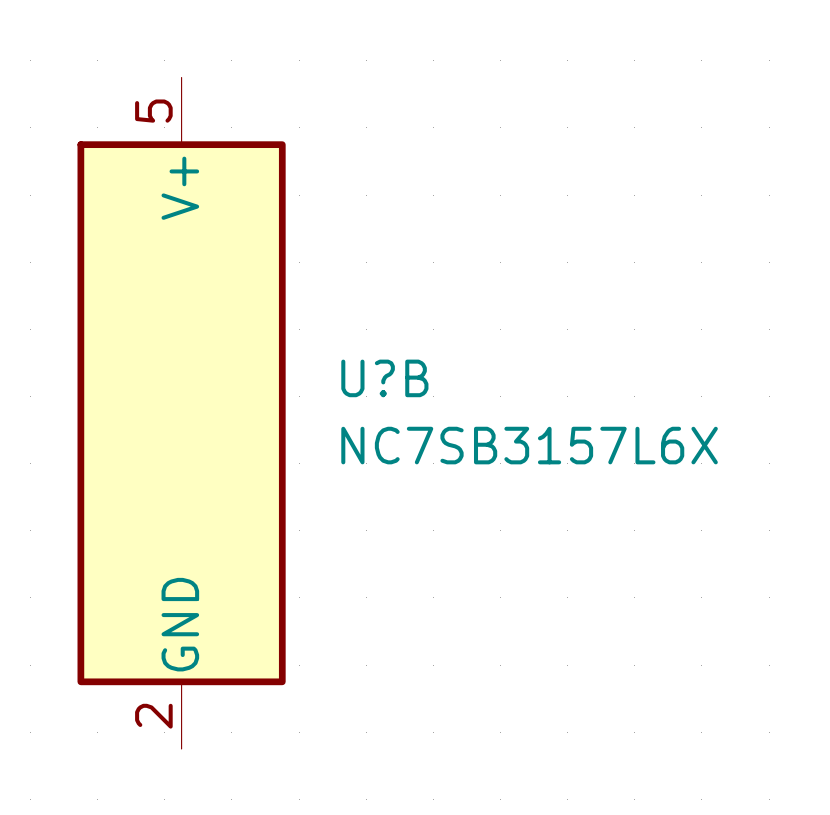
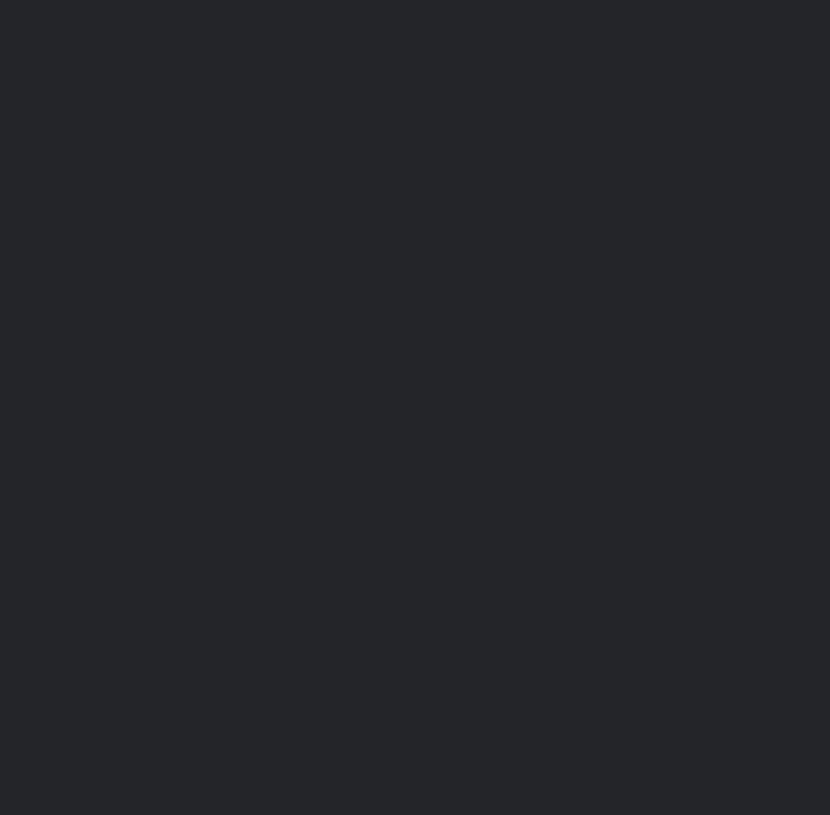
U?B: NC7SB3157L6X (181, 413) -> none

